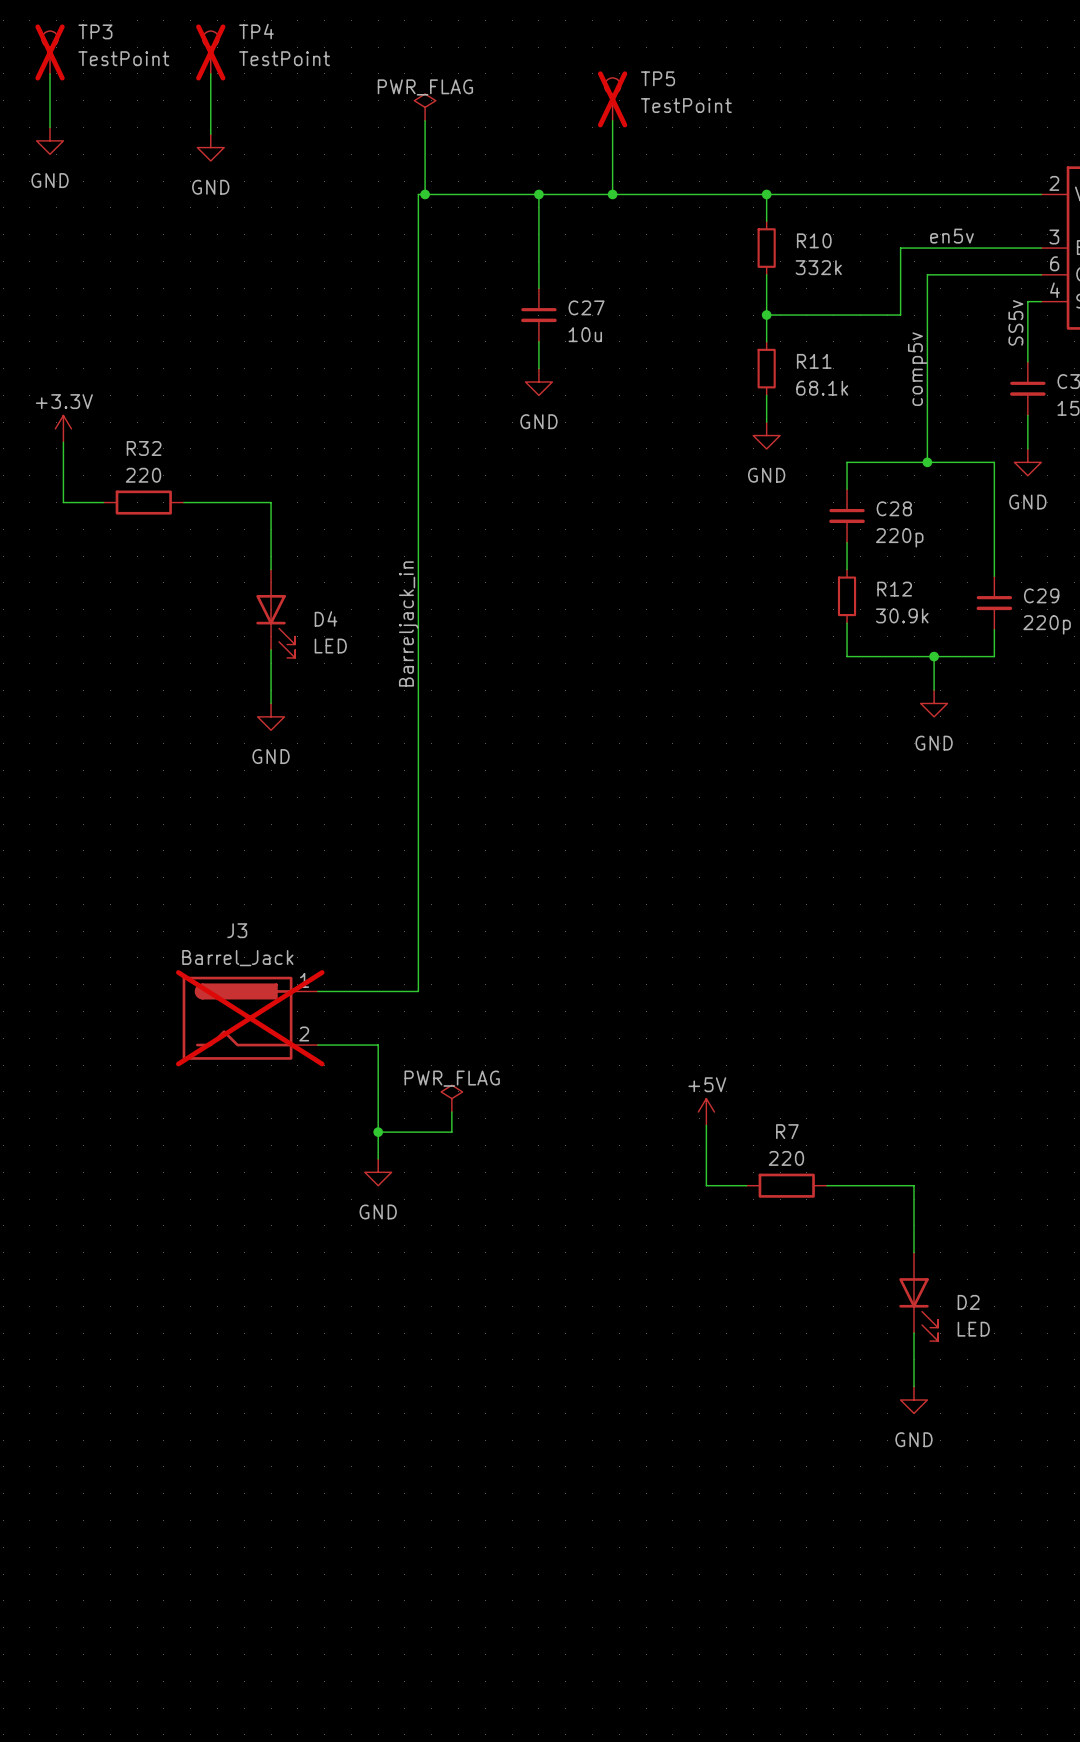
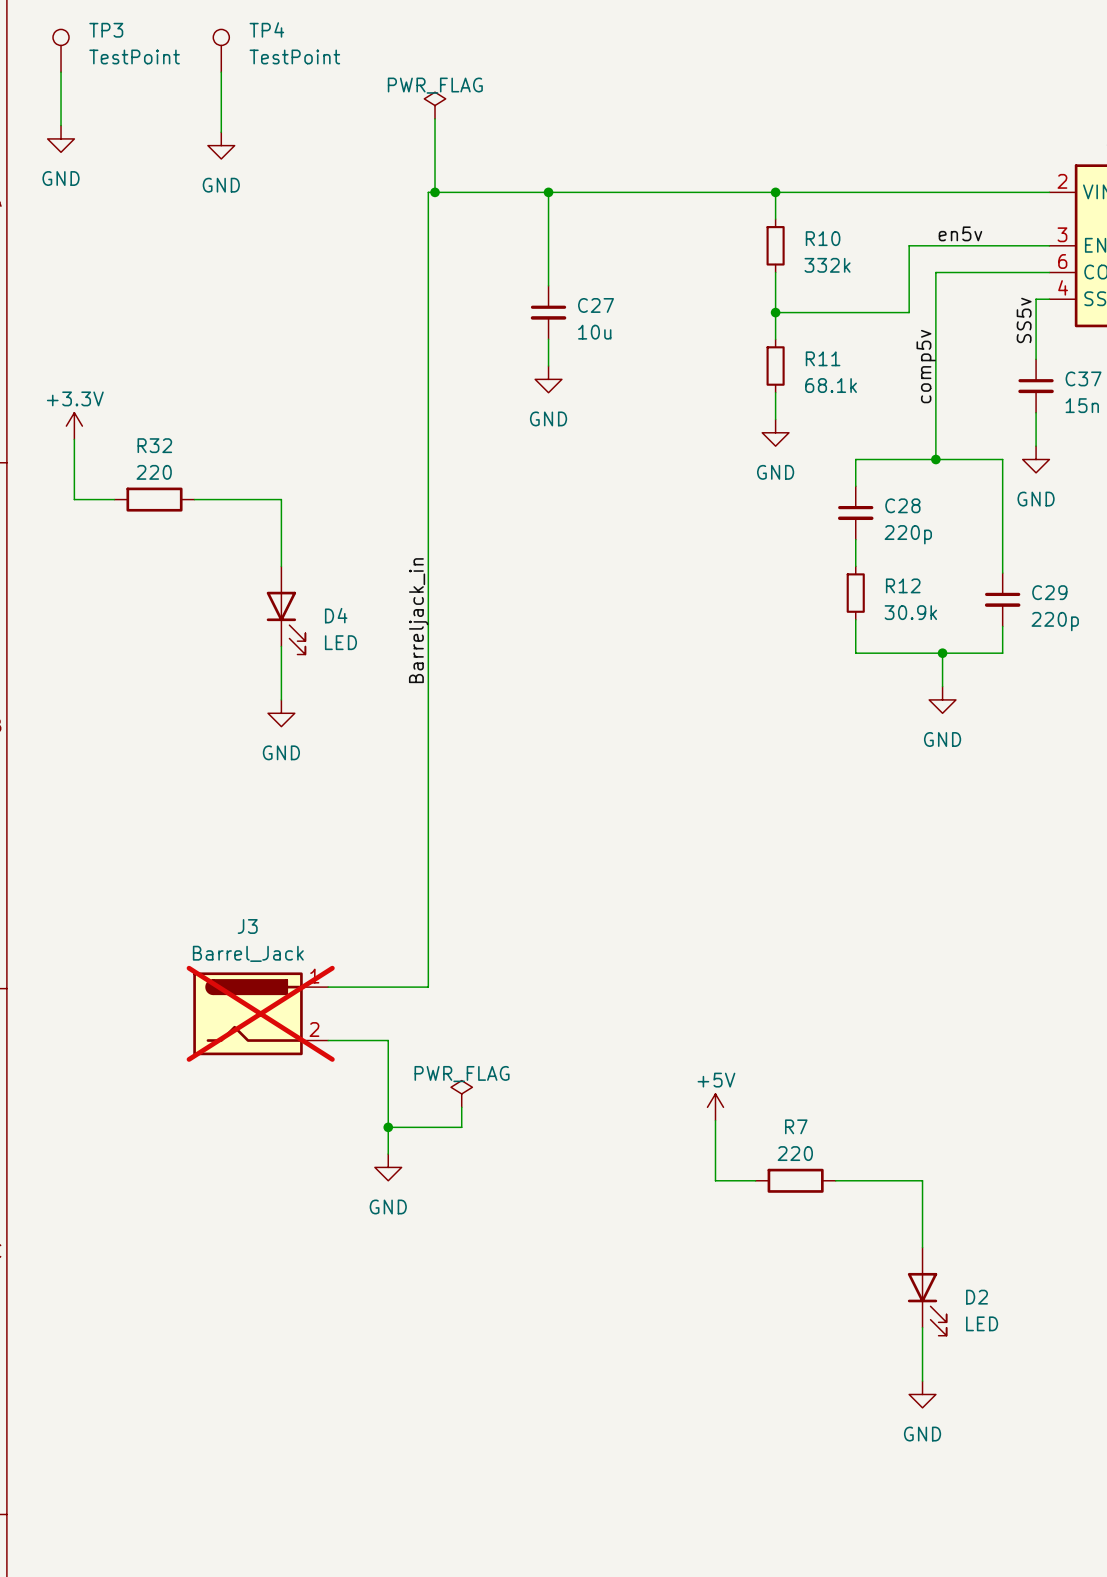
TP3 do-not-place cross: (50, 52) -> none
TP4 do-not-place cross: (210, 52) -> none
TP5: TestPoint (612, 99) -> none
wire: (612, 120) (612, 194) -> none
junction: (612, 194) -> none

